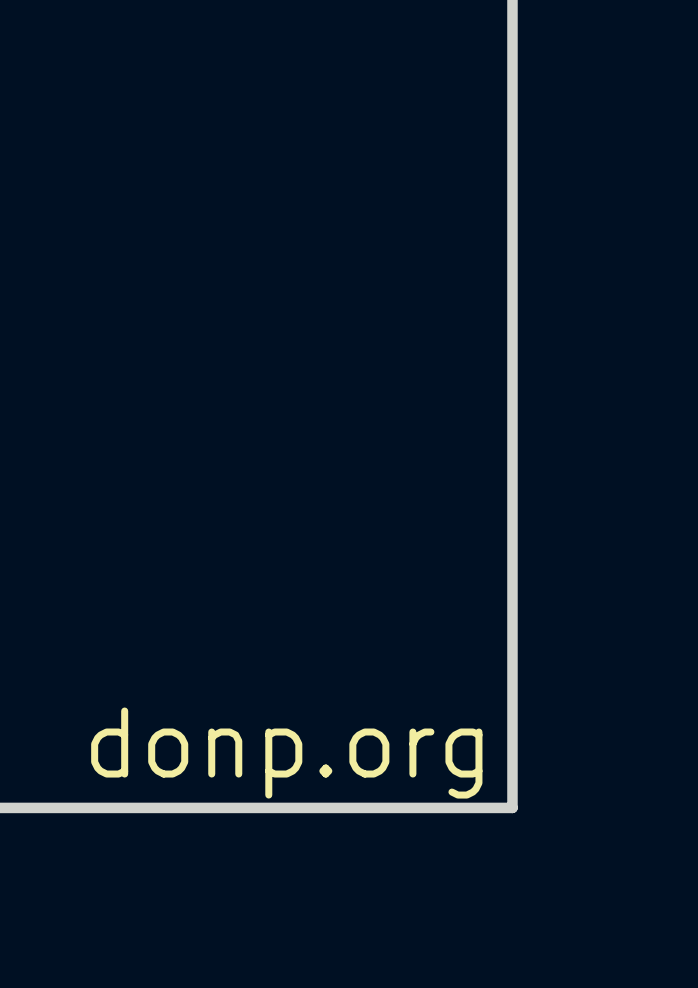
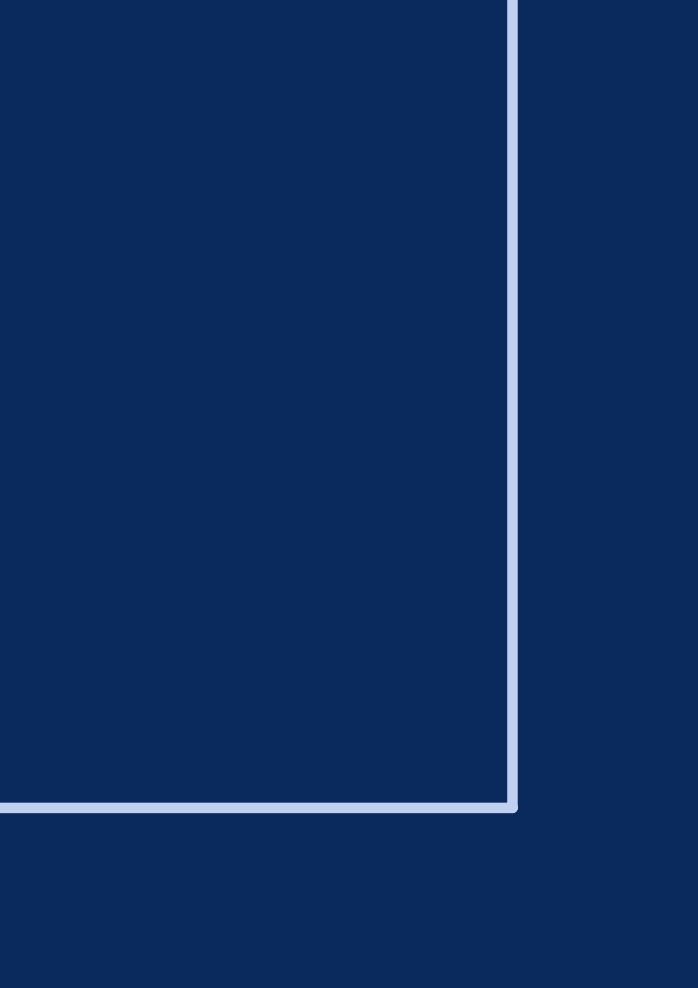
text: donp.org (286, 753) -> none

